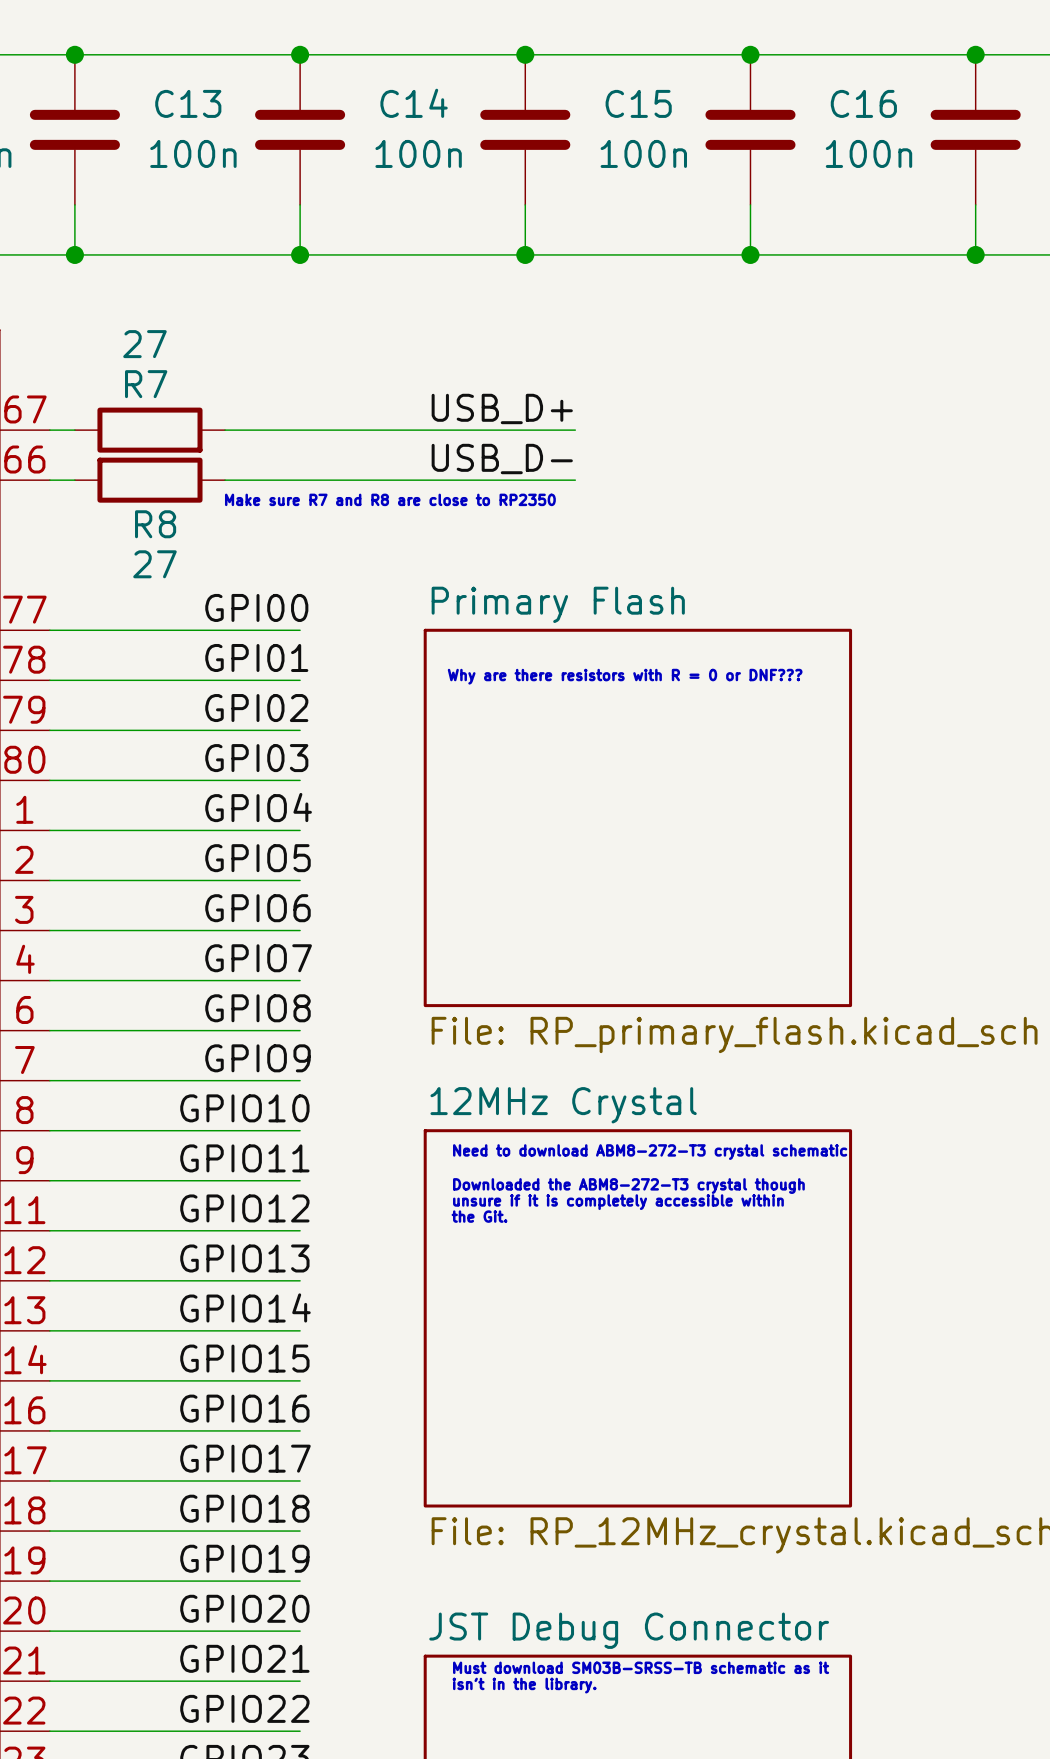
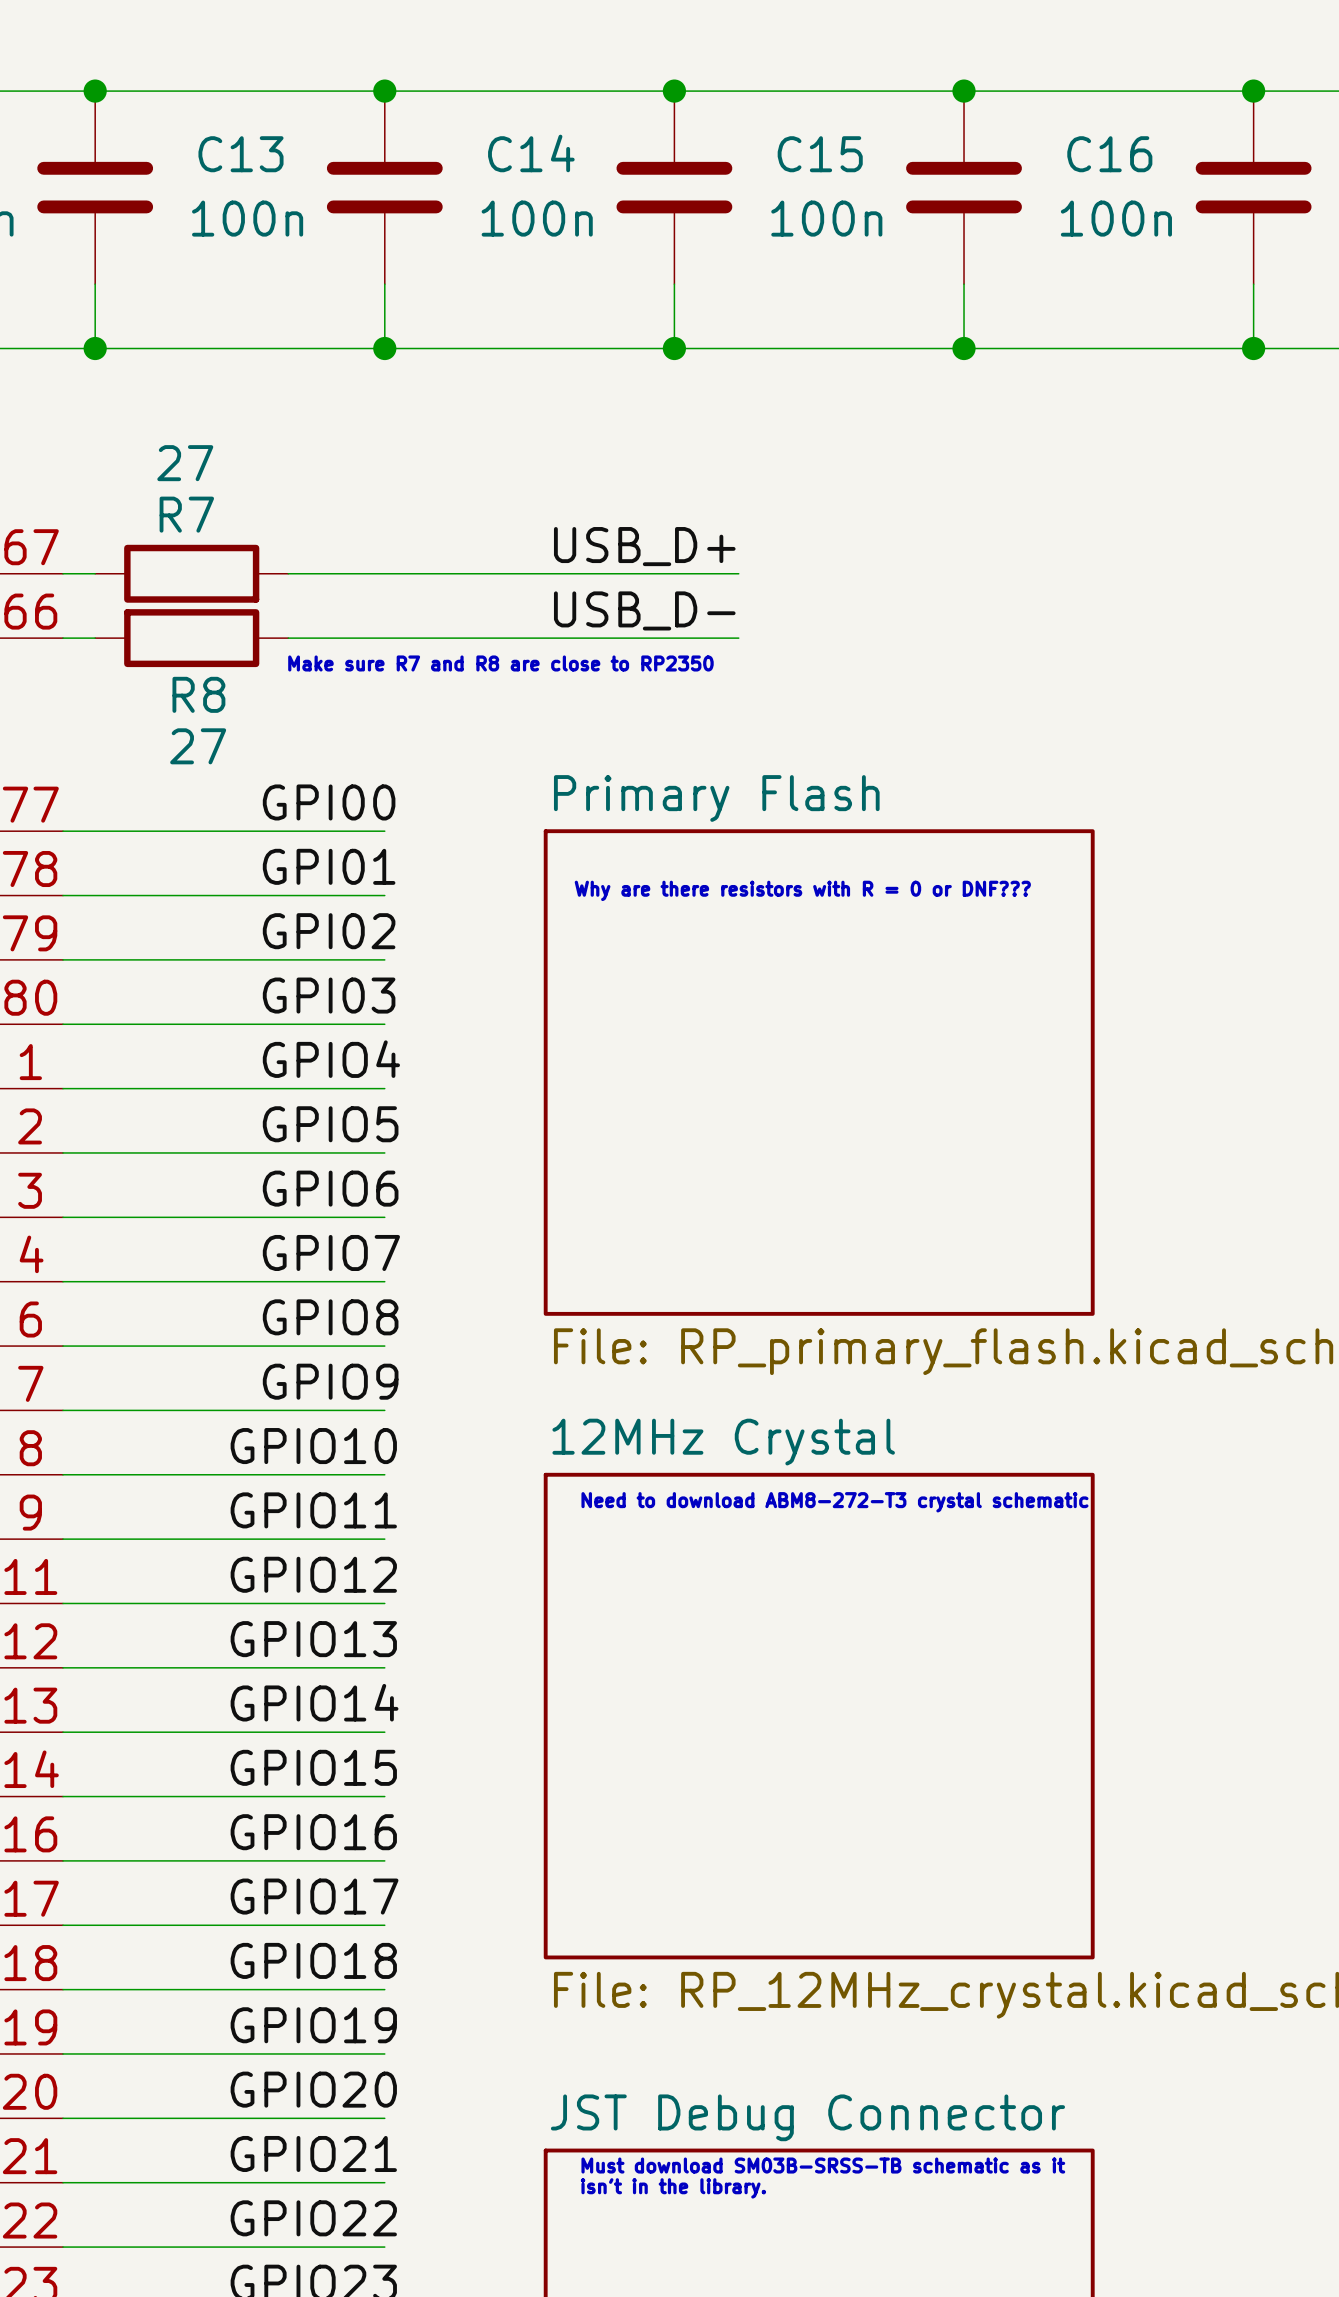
text: Downloaded the ABM8-272-T3 crystal though (628, 1186) -> none
text: unsure if it is completely accessible within (618, 1202) -> none
text: the Git. (479, 1216) -> none

